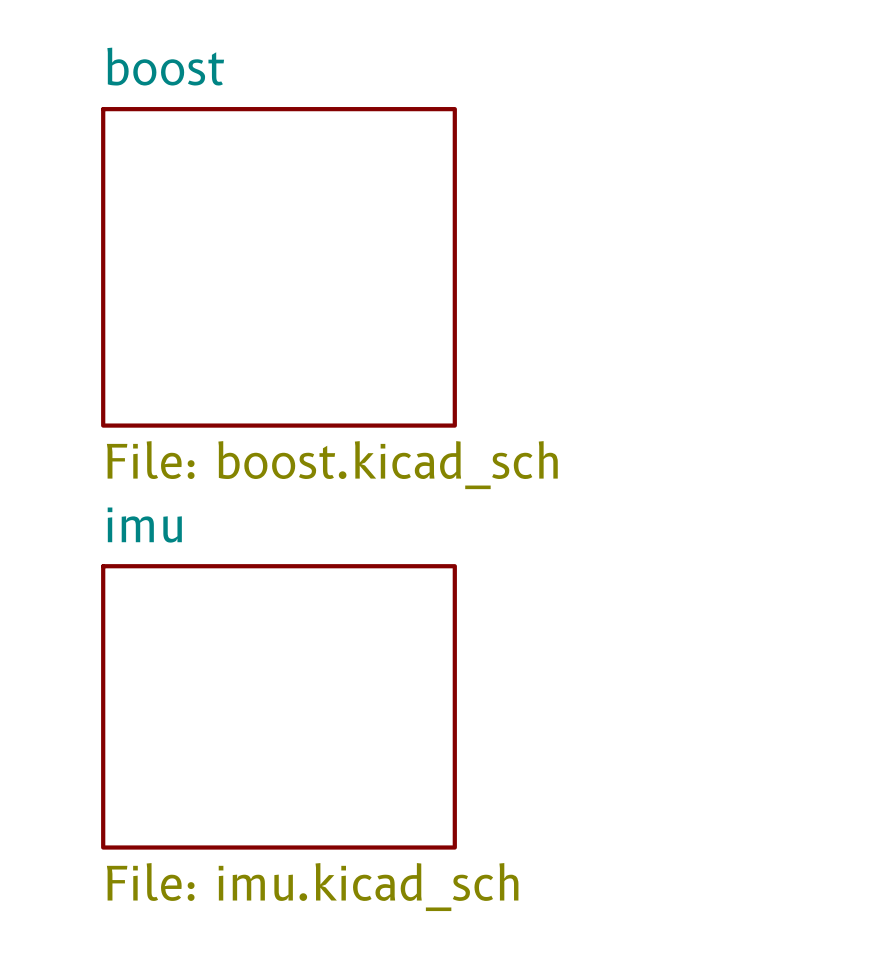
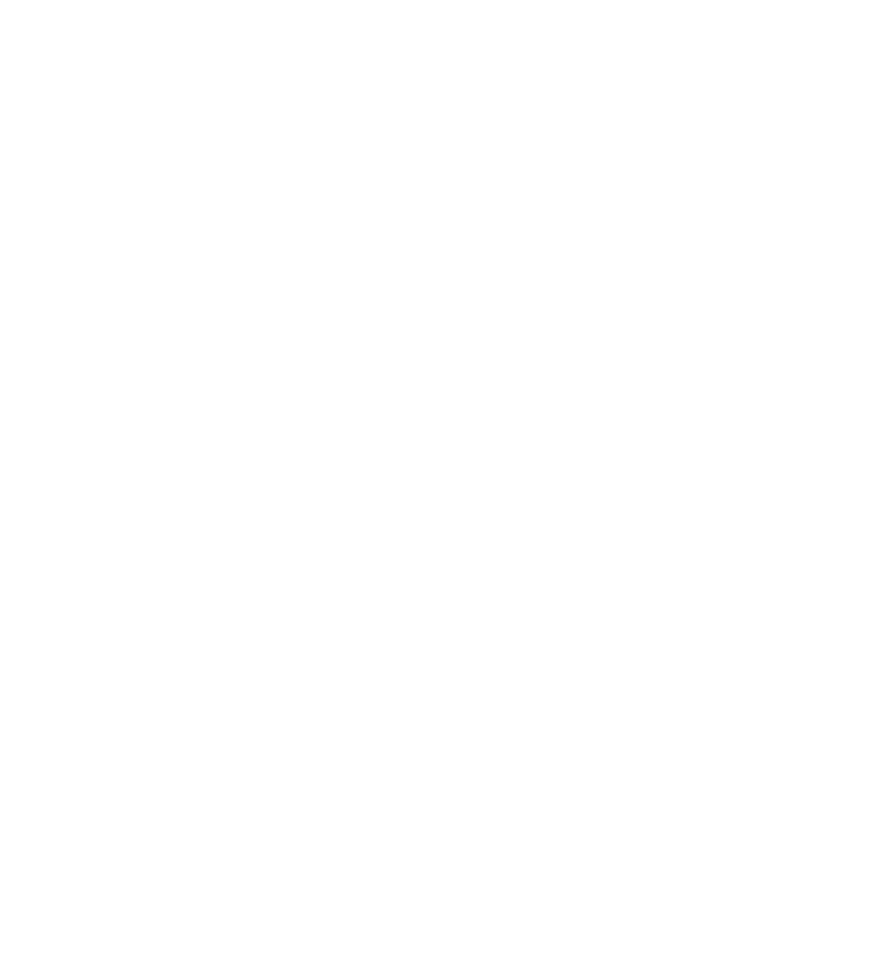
sheet boost: File: boost.kicad_sch (279, 267) -> none
sheet imu: File: imu.kicad_sch (279, 706) -> none

